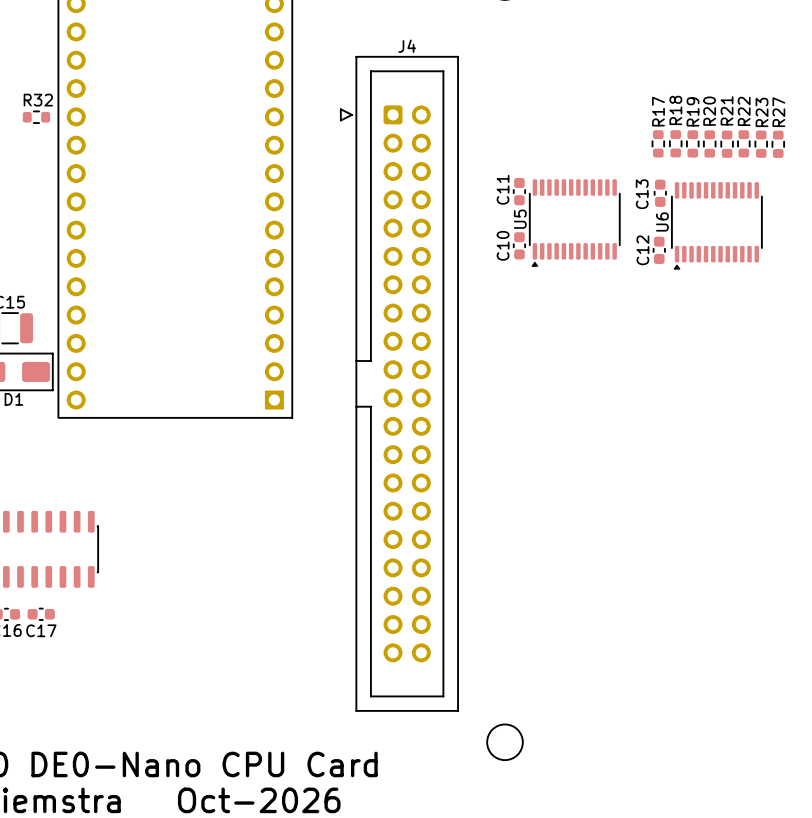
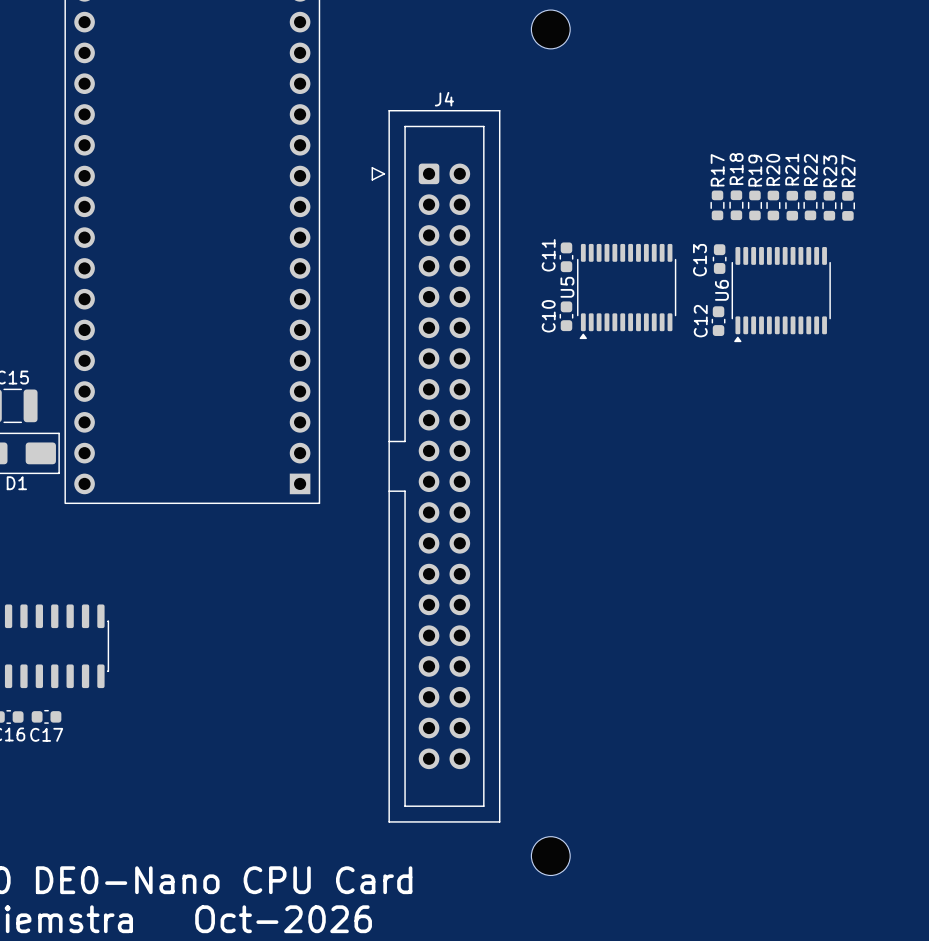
R32: (36, 117) -> none

